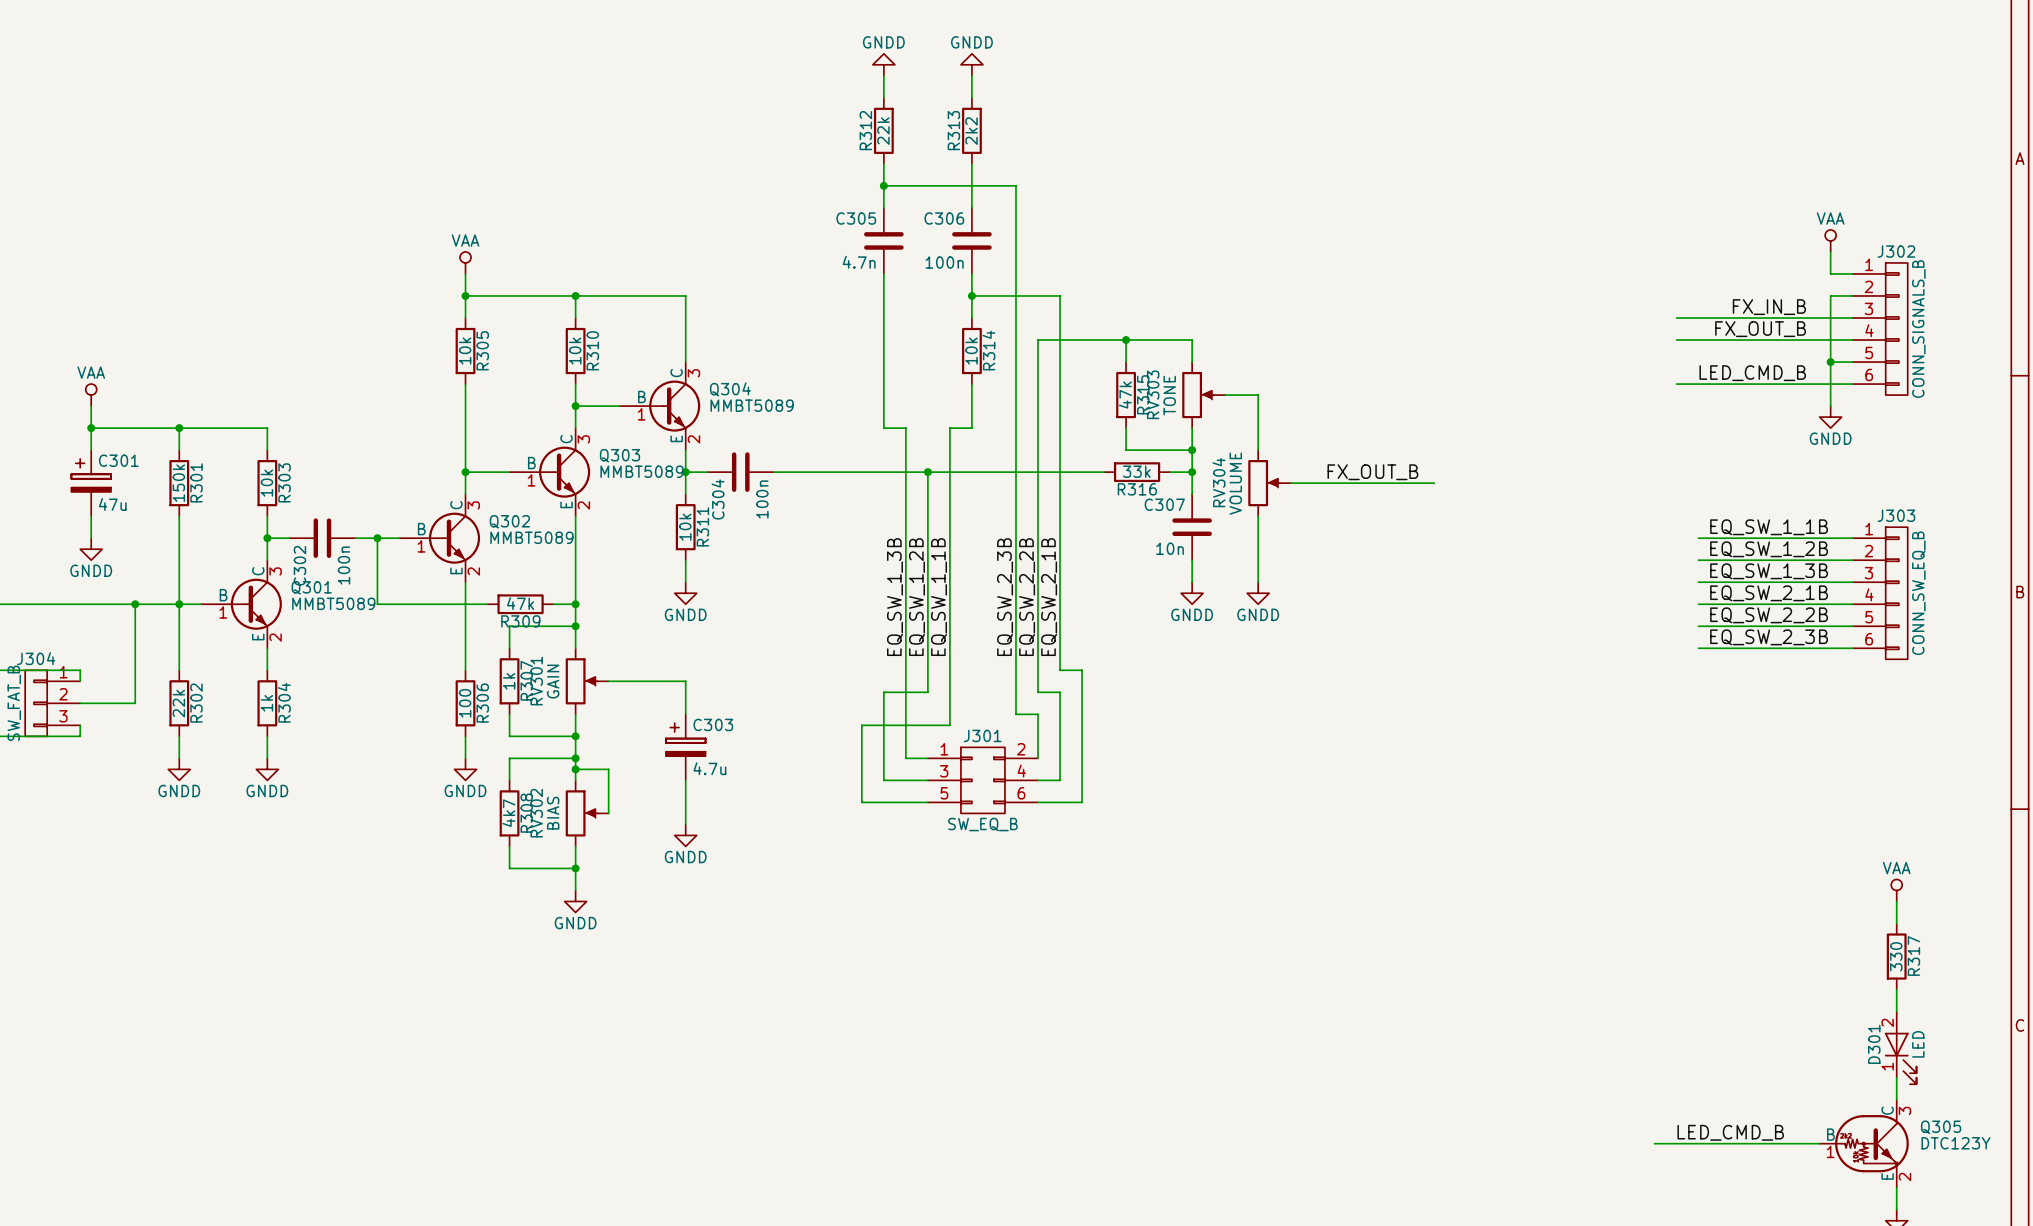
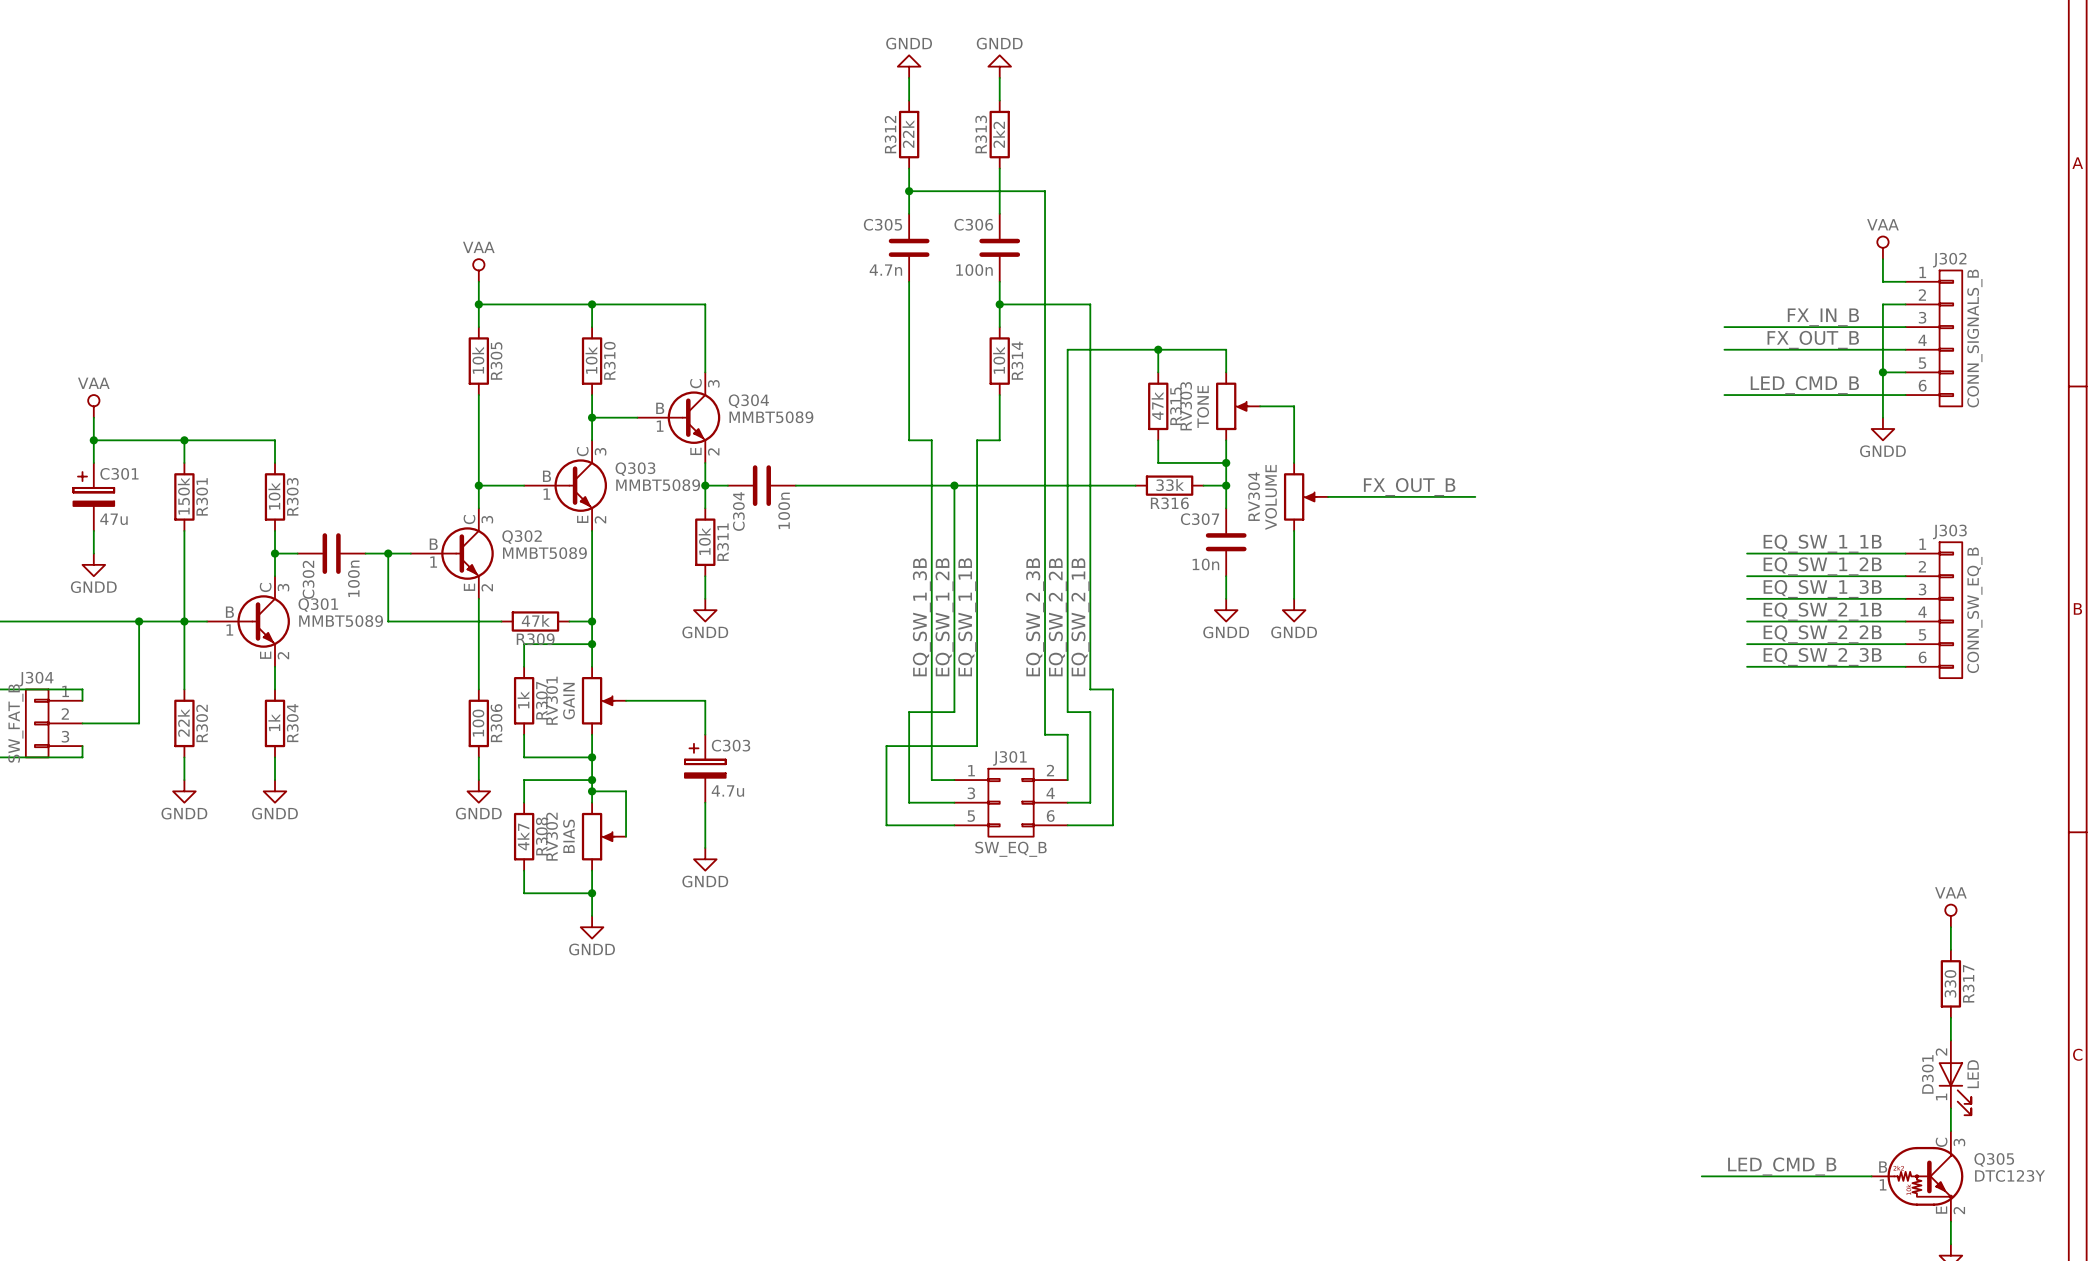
RV303 flip: as is (1198, 395) -> up-down (1232, 406)
RV304 flip: as is (1264, 483) -> up-down (1300, 496)
RV301 flip: as is (581, 681) -> up-down (598, 700)
RV302 flip: as is (581, 813) -> up-down (598, 836)

